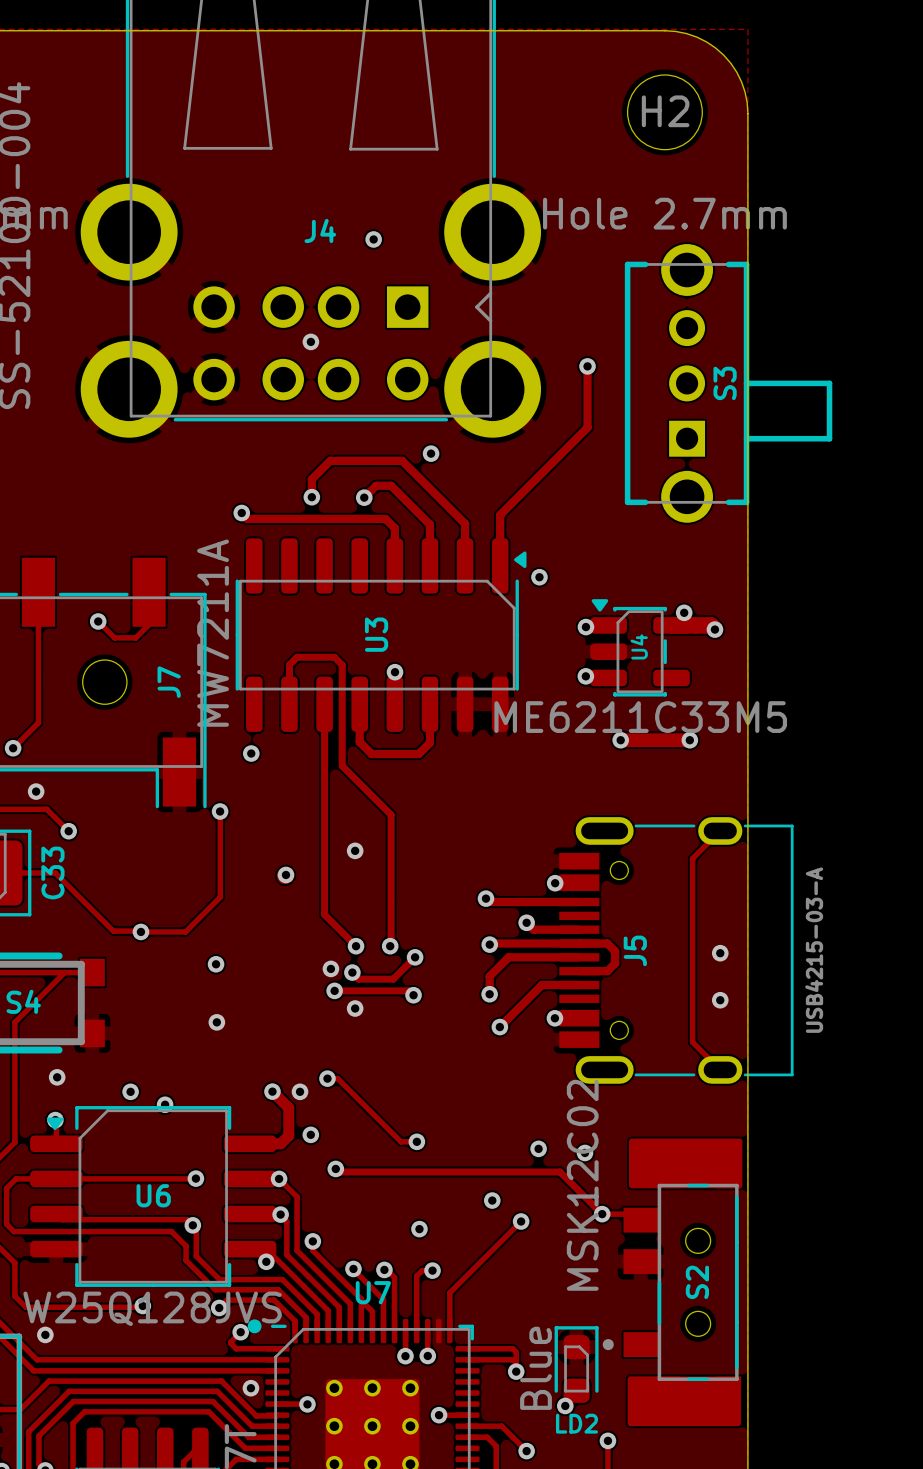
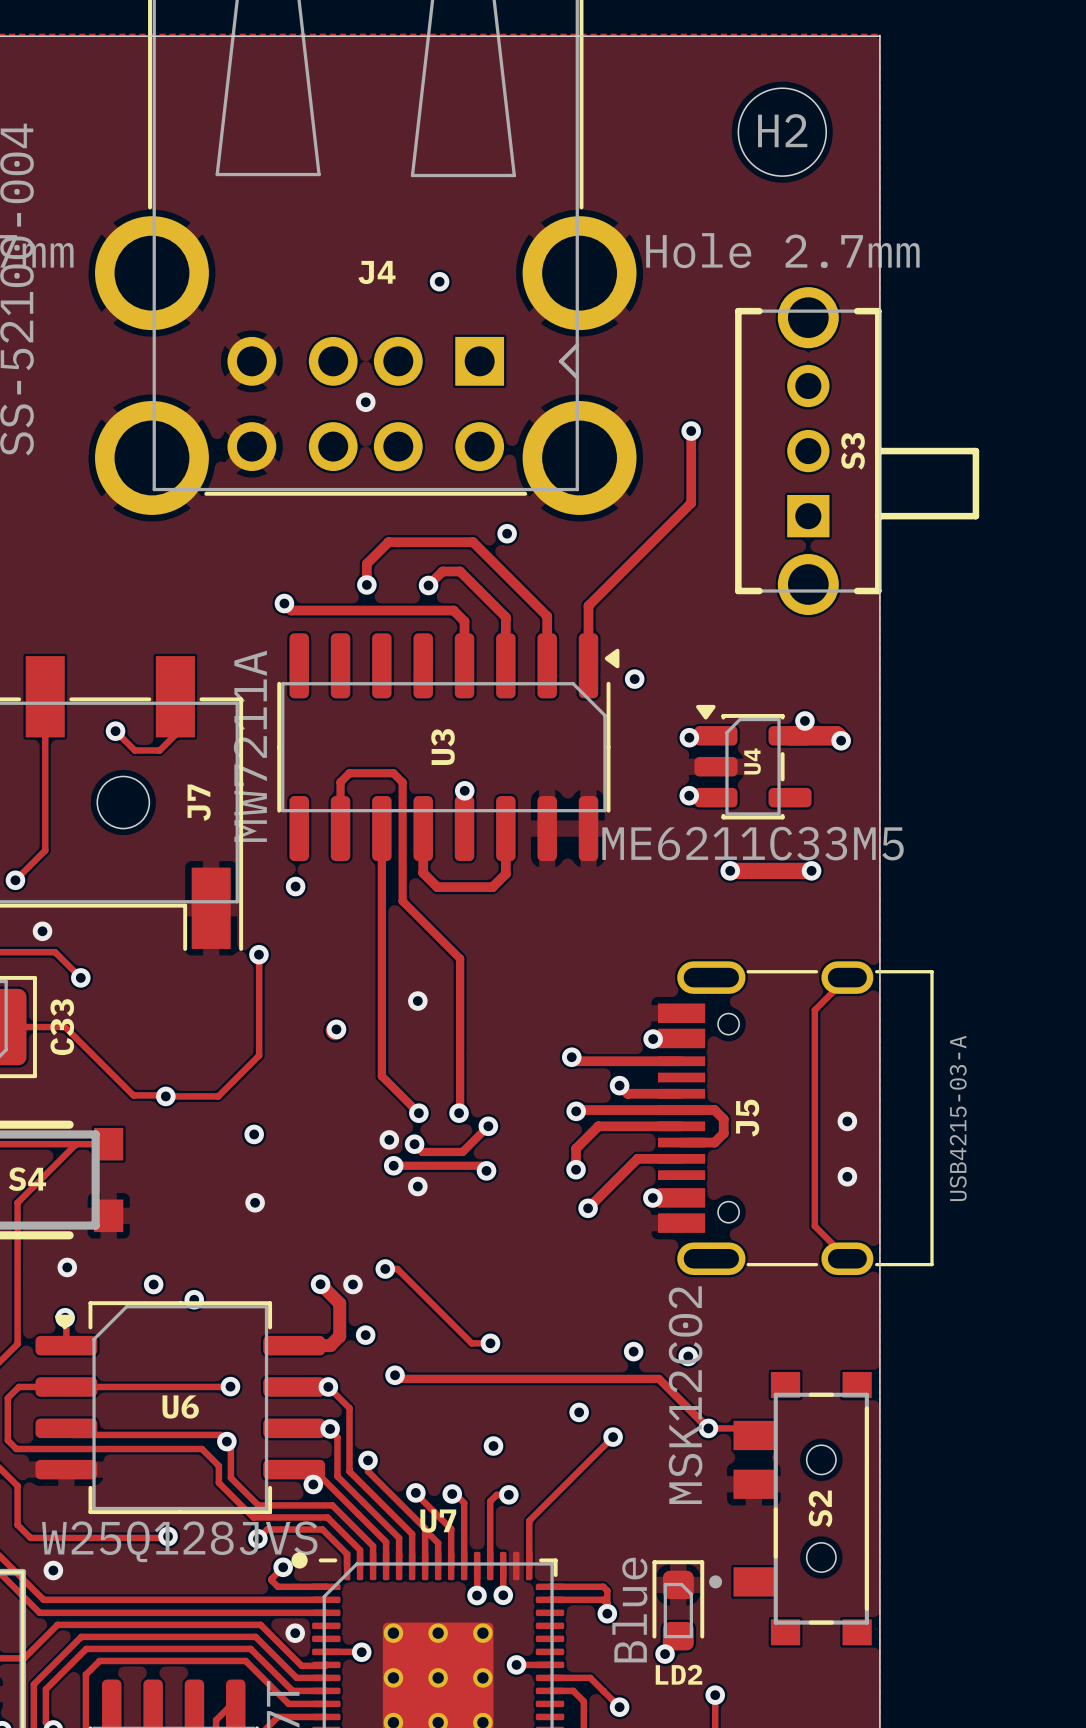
board edge: (664, 30) (696, 37) (723, 55) (741, 81) (747, 113) -> (782, 36) (879, 36) (879, 133)
drawing: [628, 1138, 743, 1189] -> none
drawing: [627, 1376, 742, 1427] -> none

